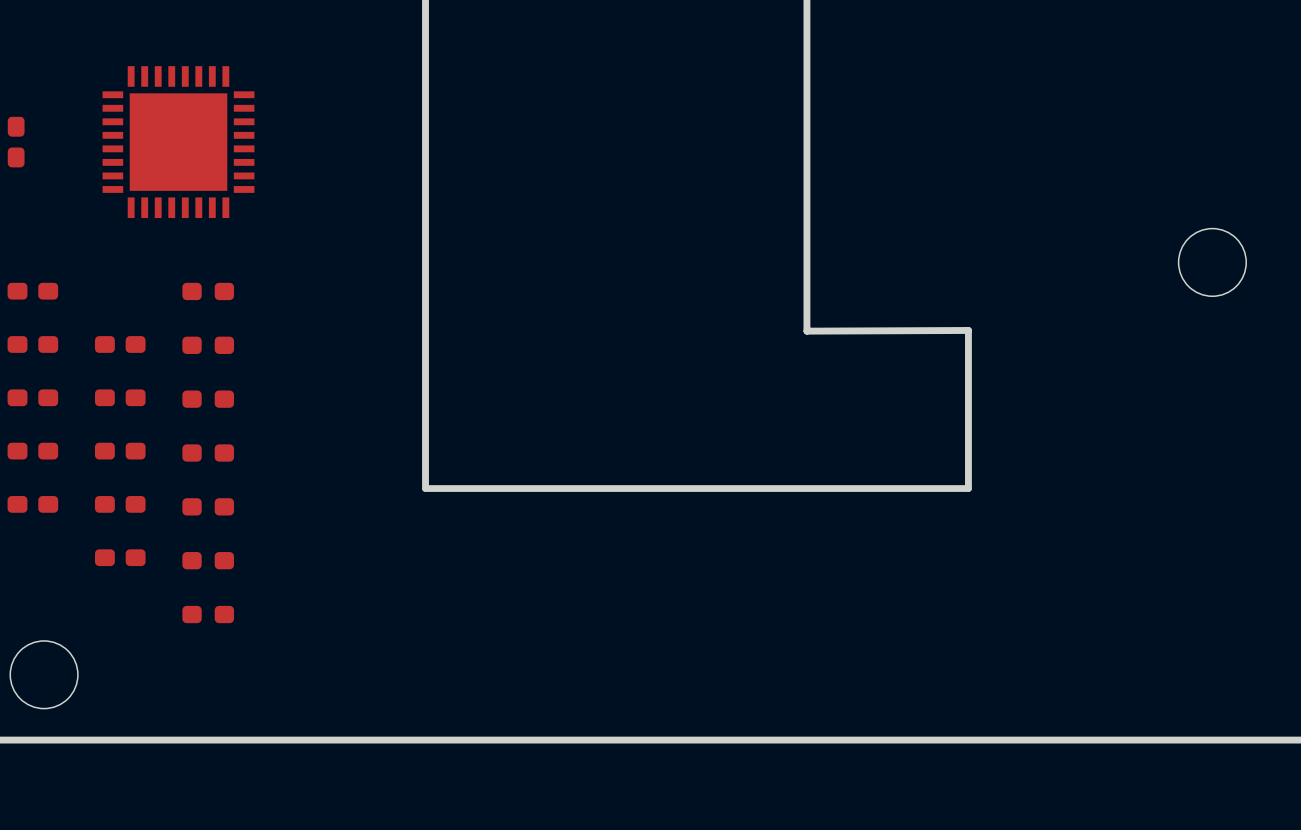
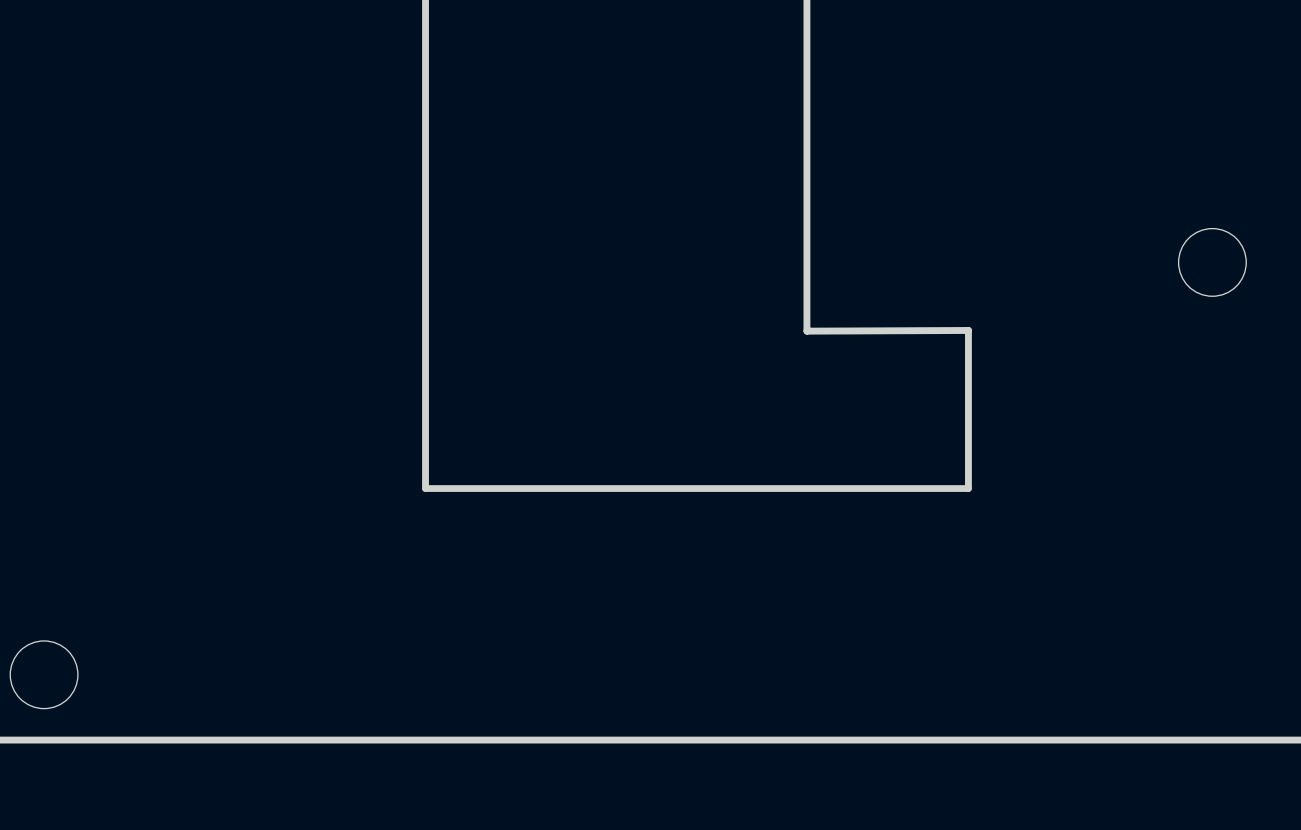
part: (16, 142) -> none
part: (178, 142) -> none
part: (32, 291) -> none
part: (208, 291) -> none
part: (32, 344) -> none
part: (120, 344) -> none
part: (208, 345) -> none
part: (32, 397) -> none
part: (120, 397) -> none
part: (208, 399) -> none
part: (32, 451) -> none
part: (120, 451) -> none
part: (208, 452) -> none
part: (32, 504) -> none
part: (120, 504) -> none
part: (208, 506) -> none
part: (120, 557) -> none
part: (208, 560) -> none
part: (208, 614) -> none

